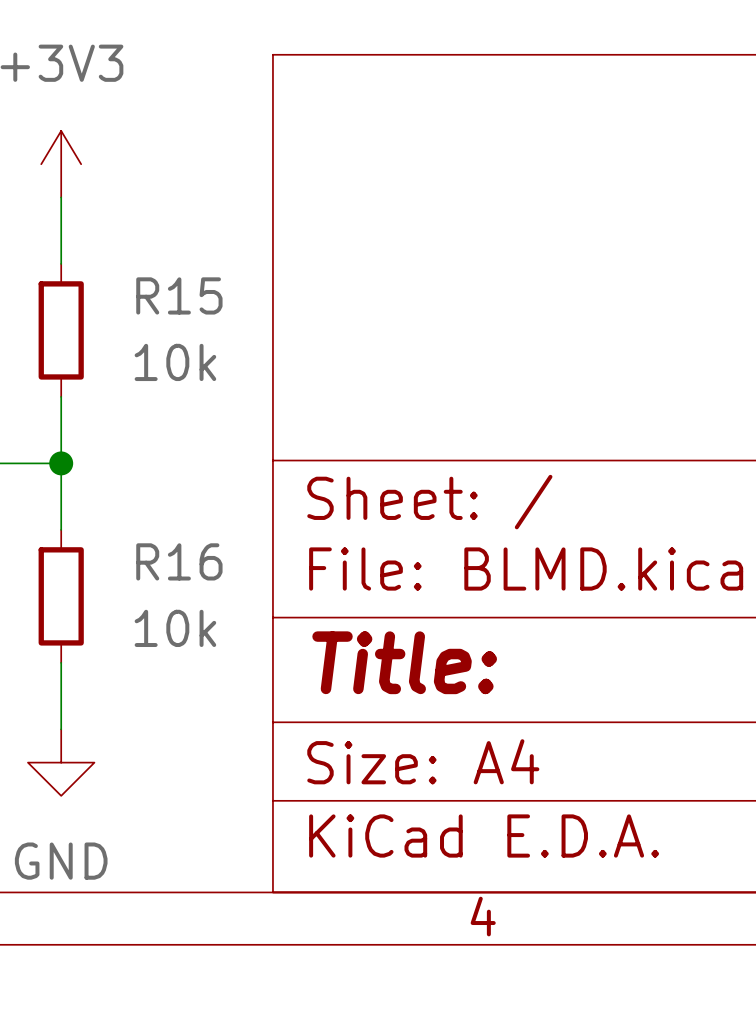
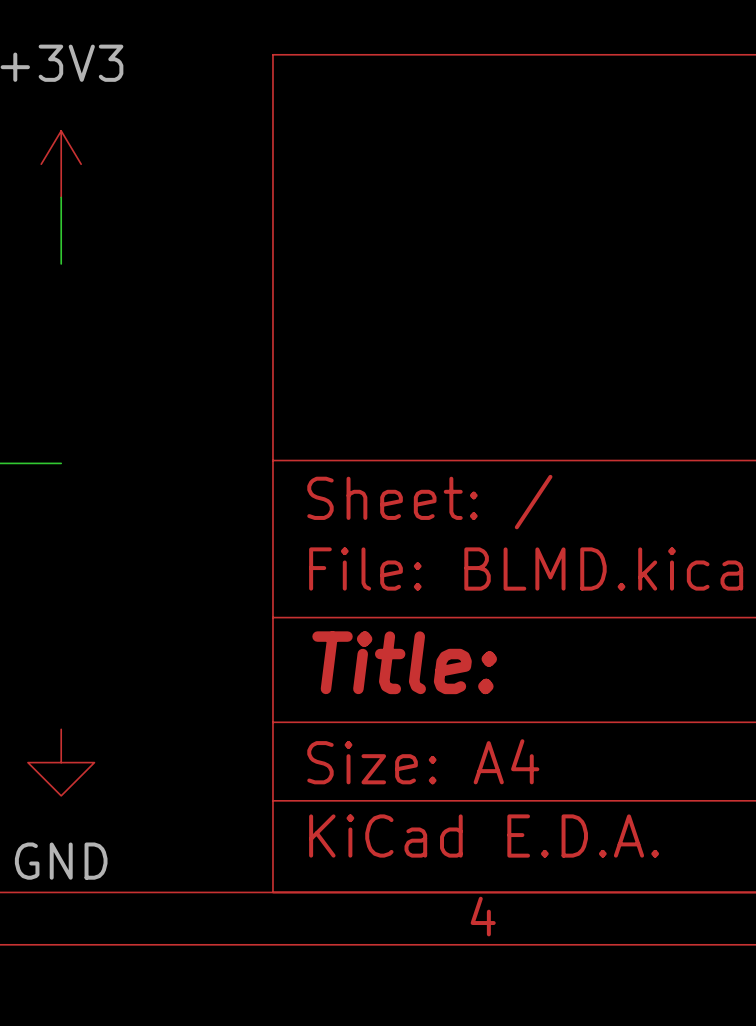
R15: 10k (61, 330) -> none
wire: (61, 396) (61, 529) -> none
junction: (61, 463) -> none
R16: 10k (61, 596) -> none
wire: (61, 662) (61, 729) -> none

